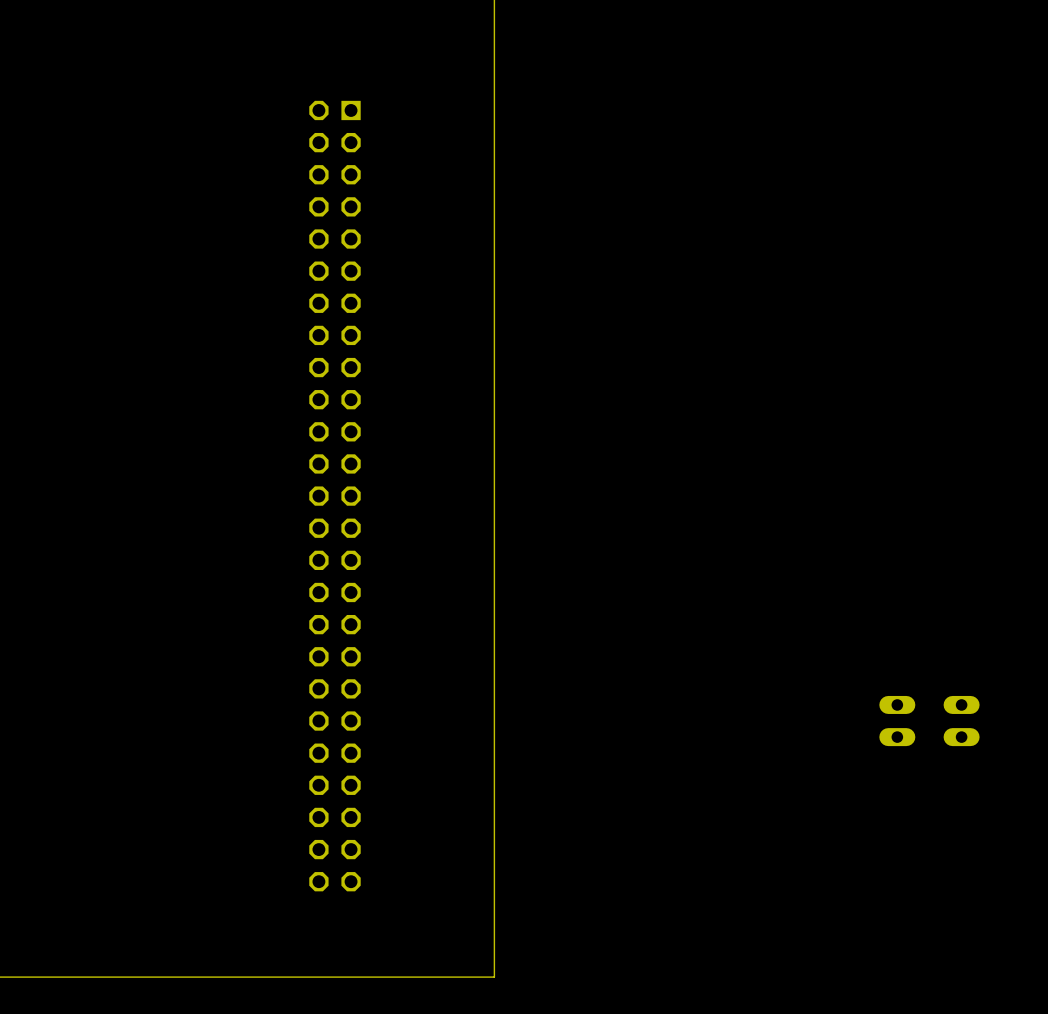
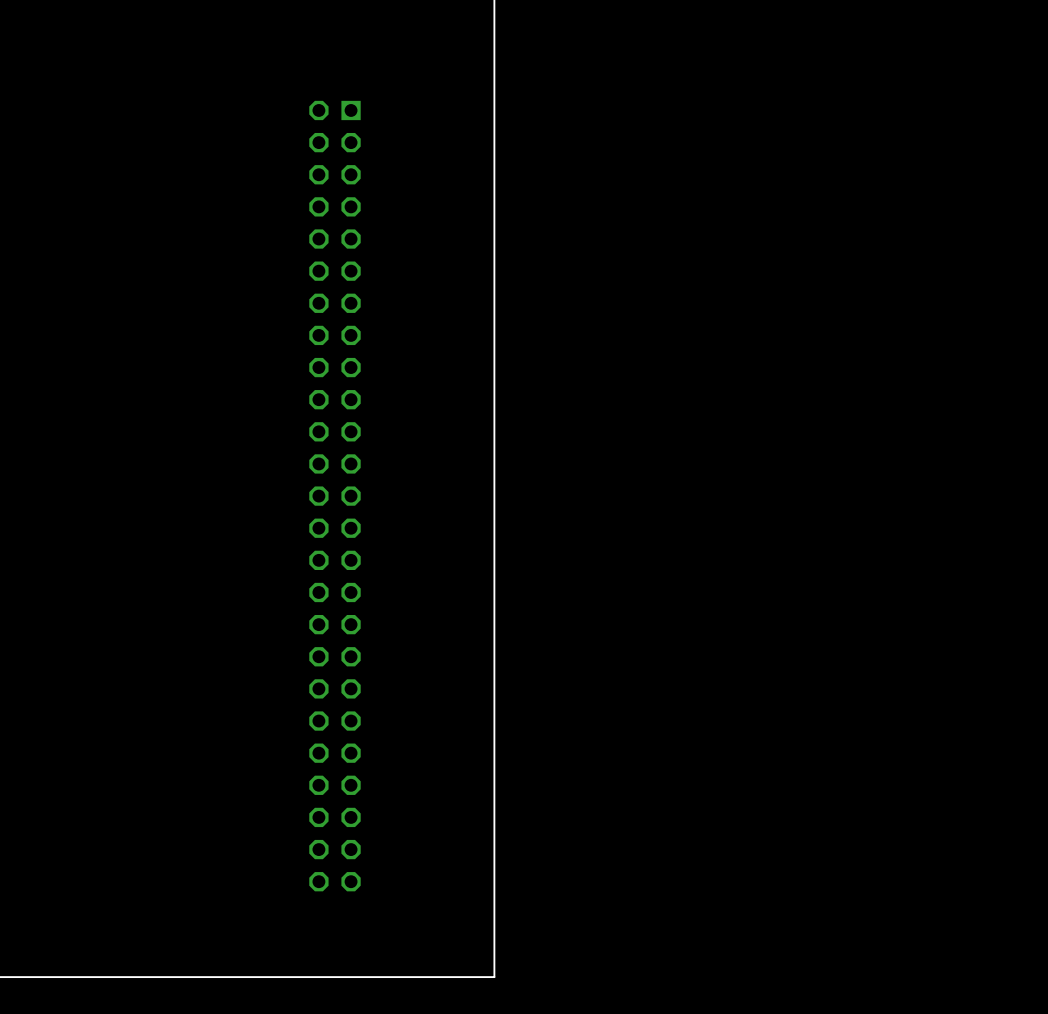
part: (897, 721) -> none
part: (961, 721) -> none

